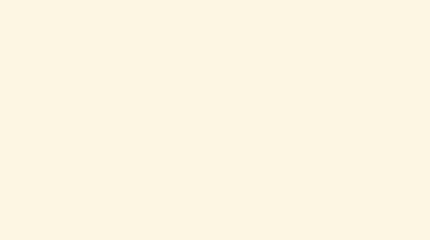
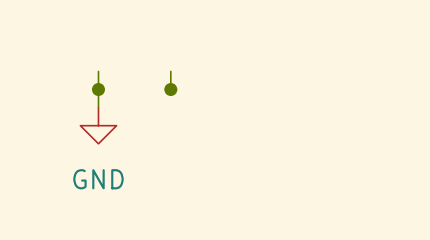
wire: none -> (98, 71) (98, 107)
wire: none -> (170, 71) (170, 89)
junction: none -> (98, 89)
junction: none -> (170, 89)
power symbol: none -> GND (98, 125)

